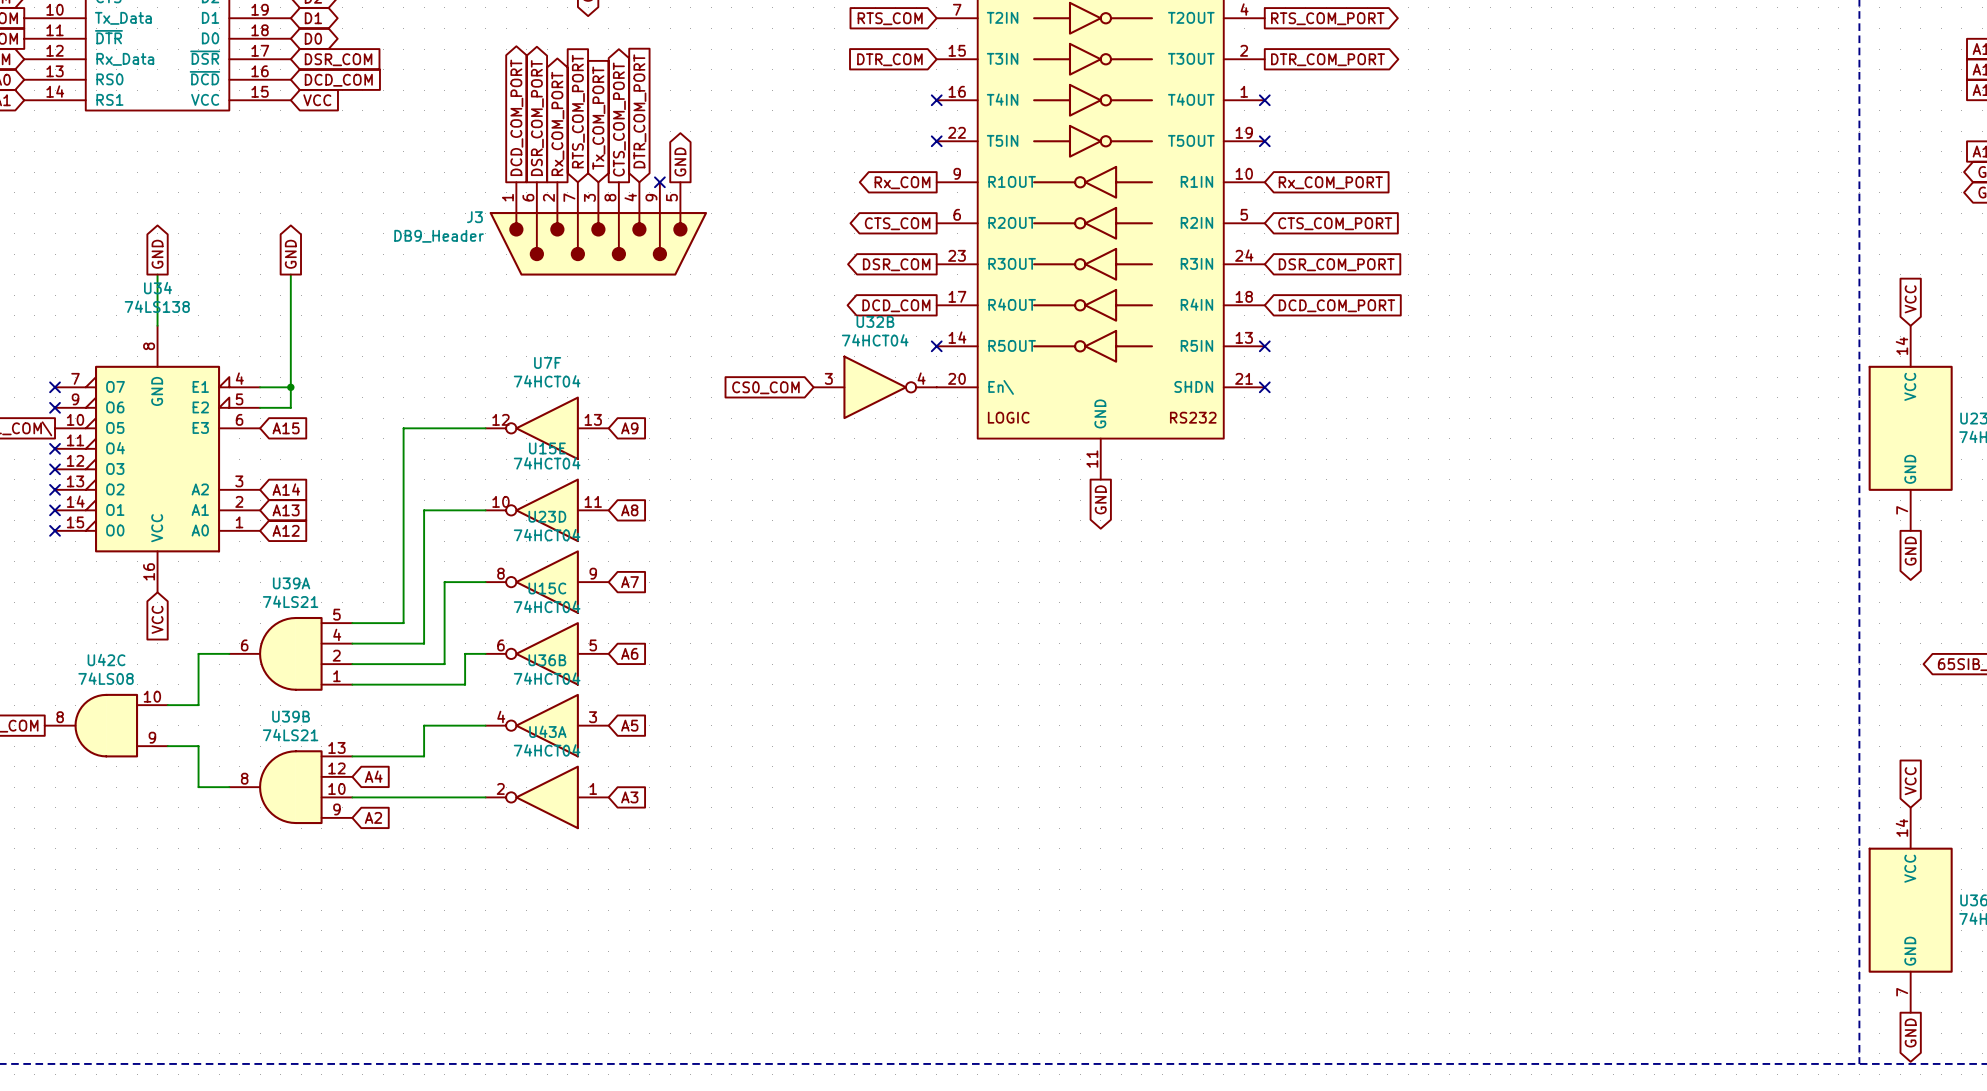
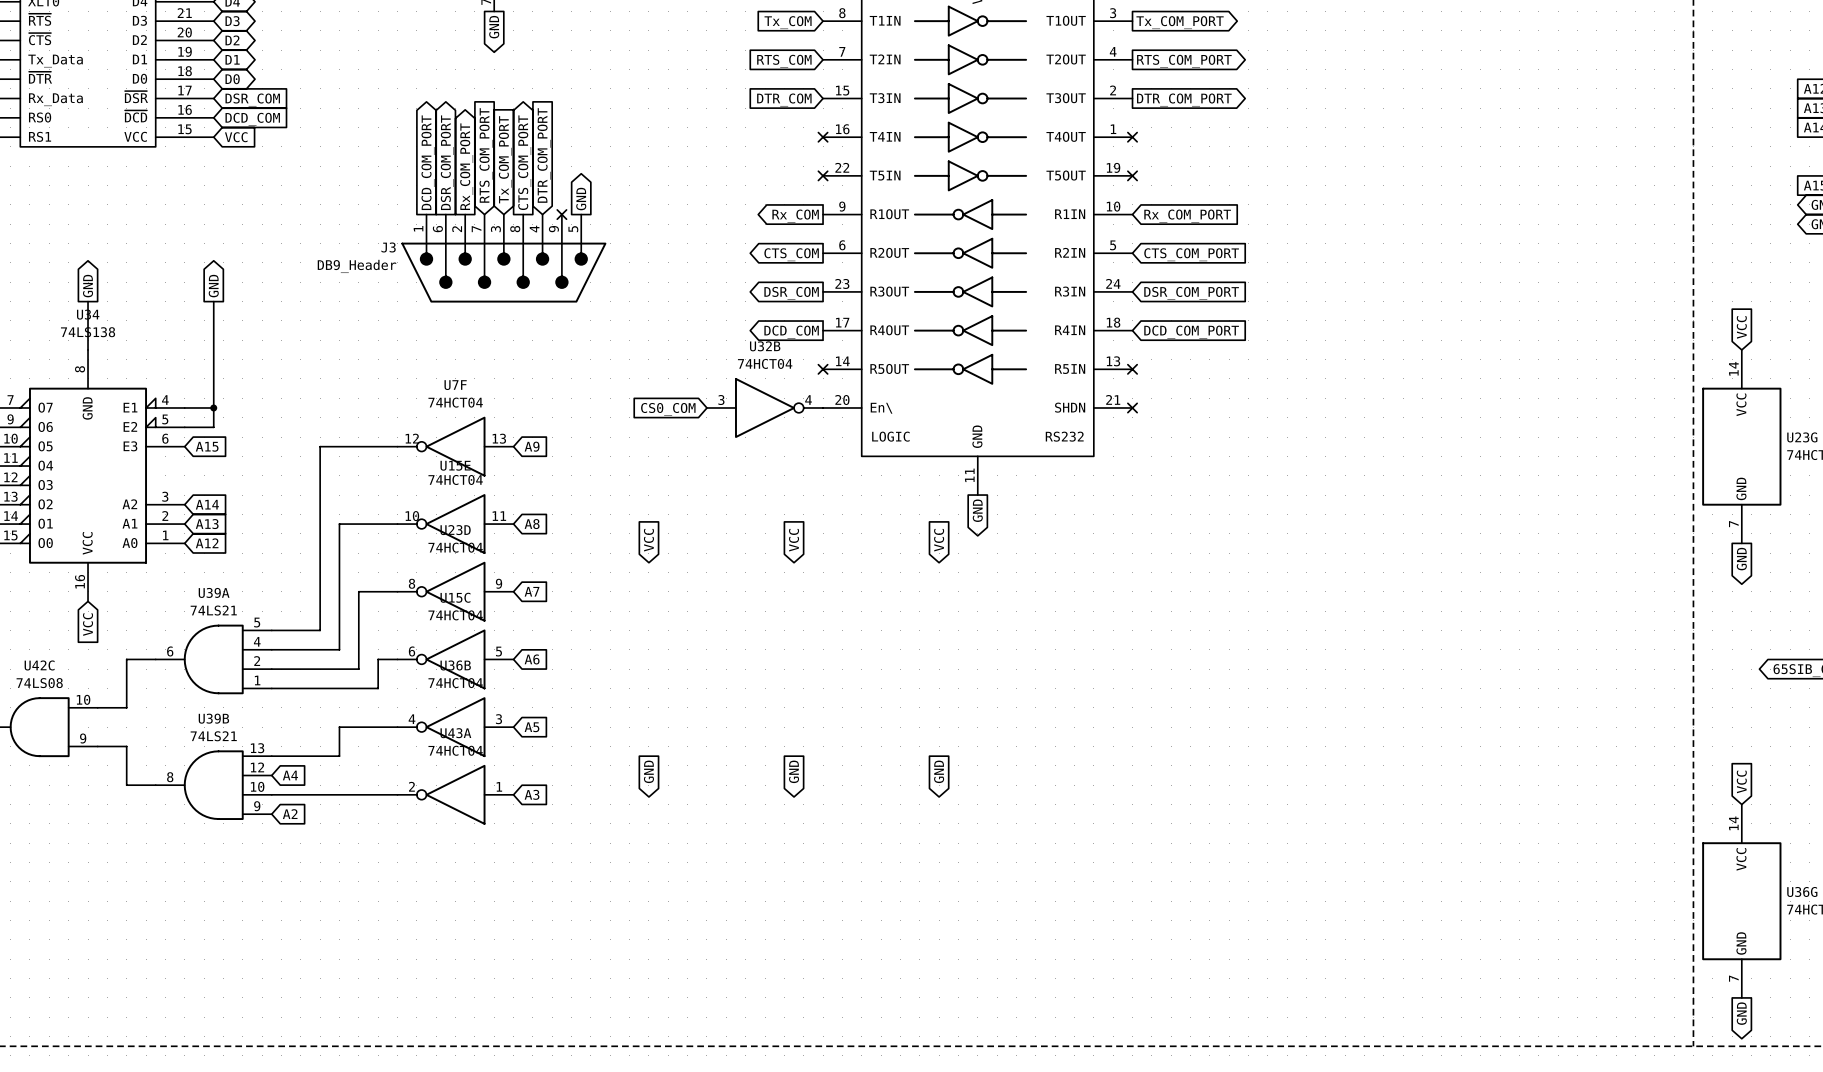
global label: none -> VCC (648, 540)
global label: none -> VCC (794, 540)
global label: none -> VCC (939, 540)
global label: none -> GND (648, 771)
global label: none -> GND (794, 771)
global label: none -> GND (939, 771)

